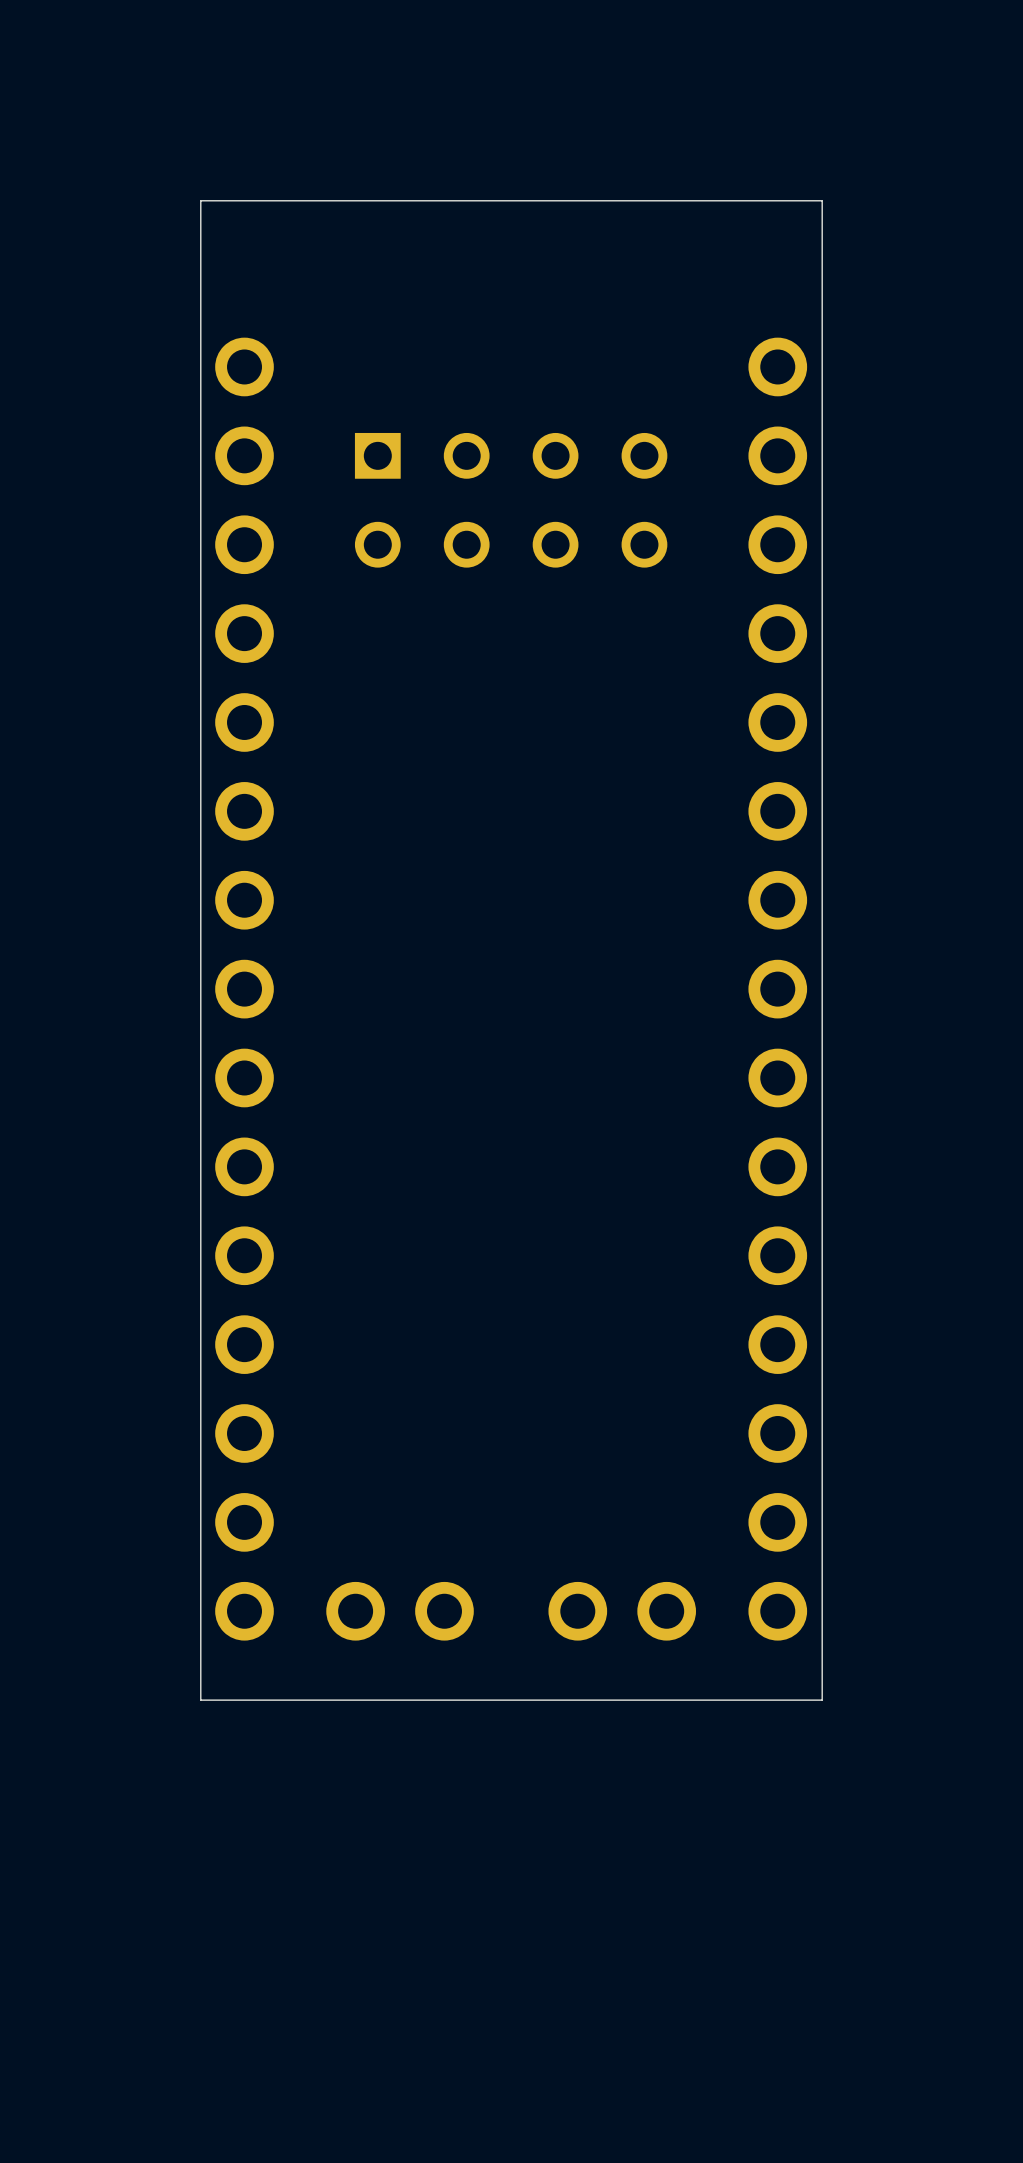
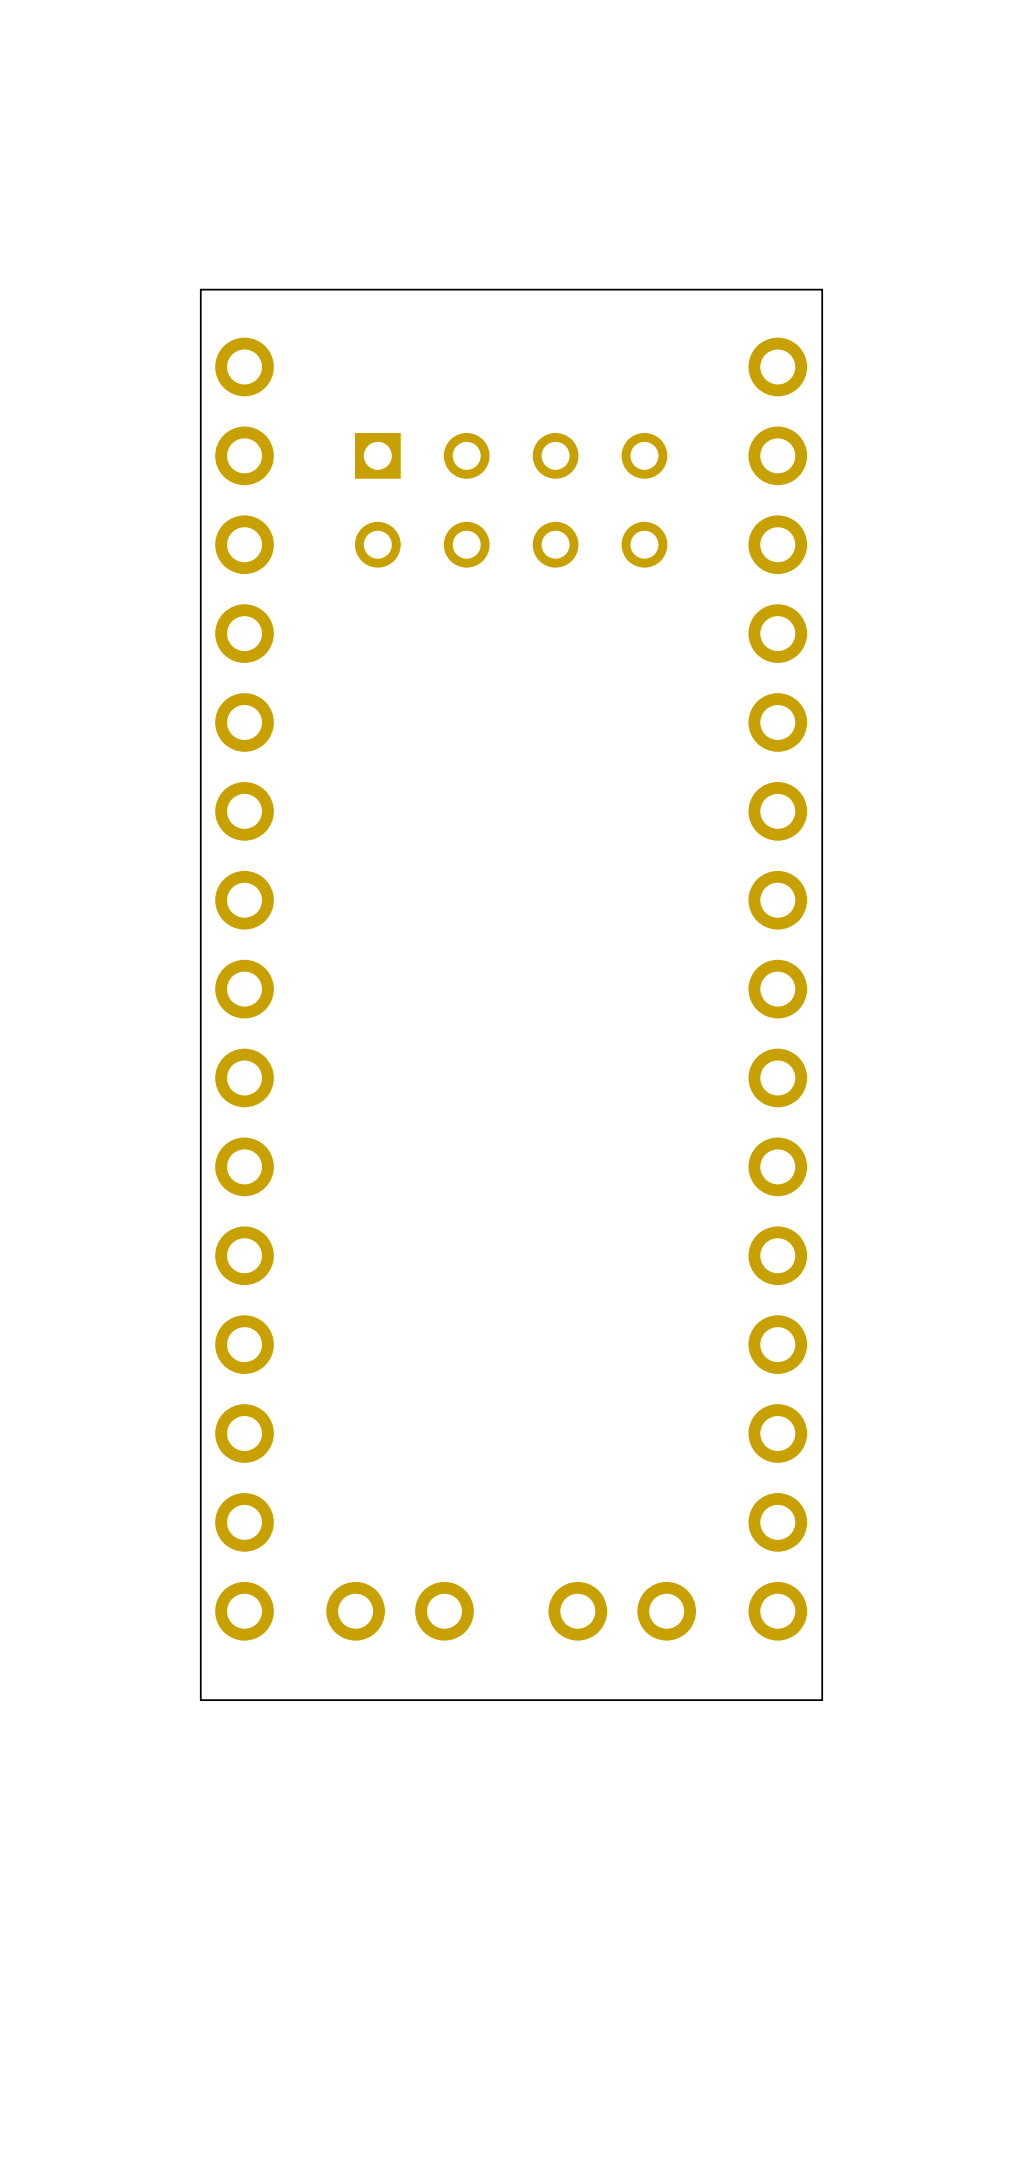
board edge: (822, 289) (822, 200) (200, 200) (200, 289) -> (822, 289) (200, 289)

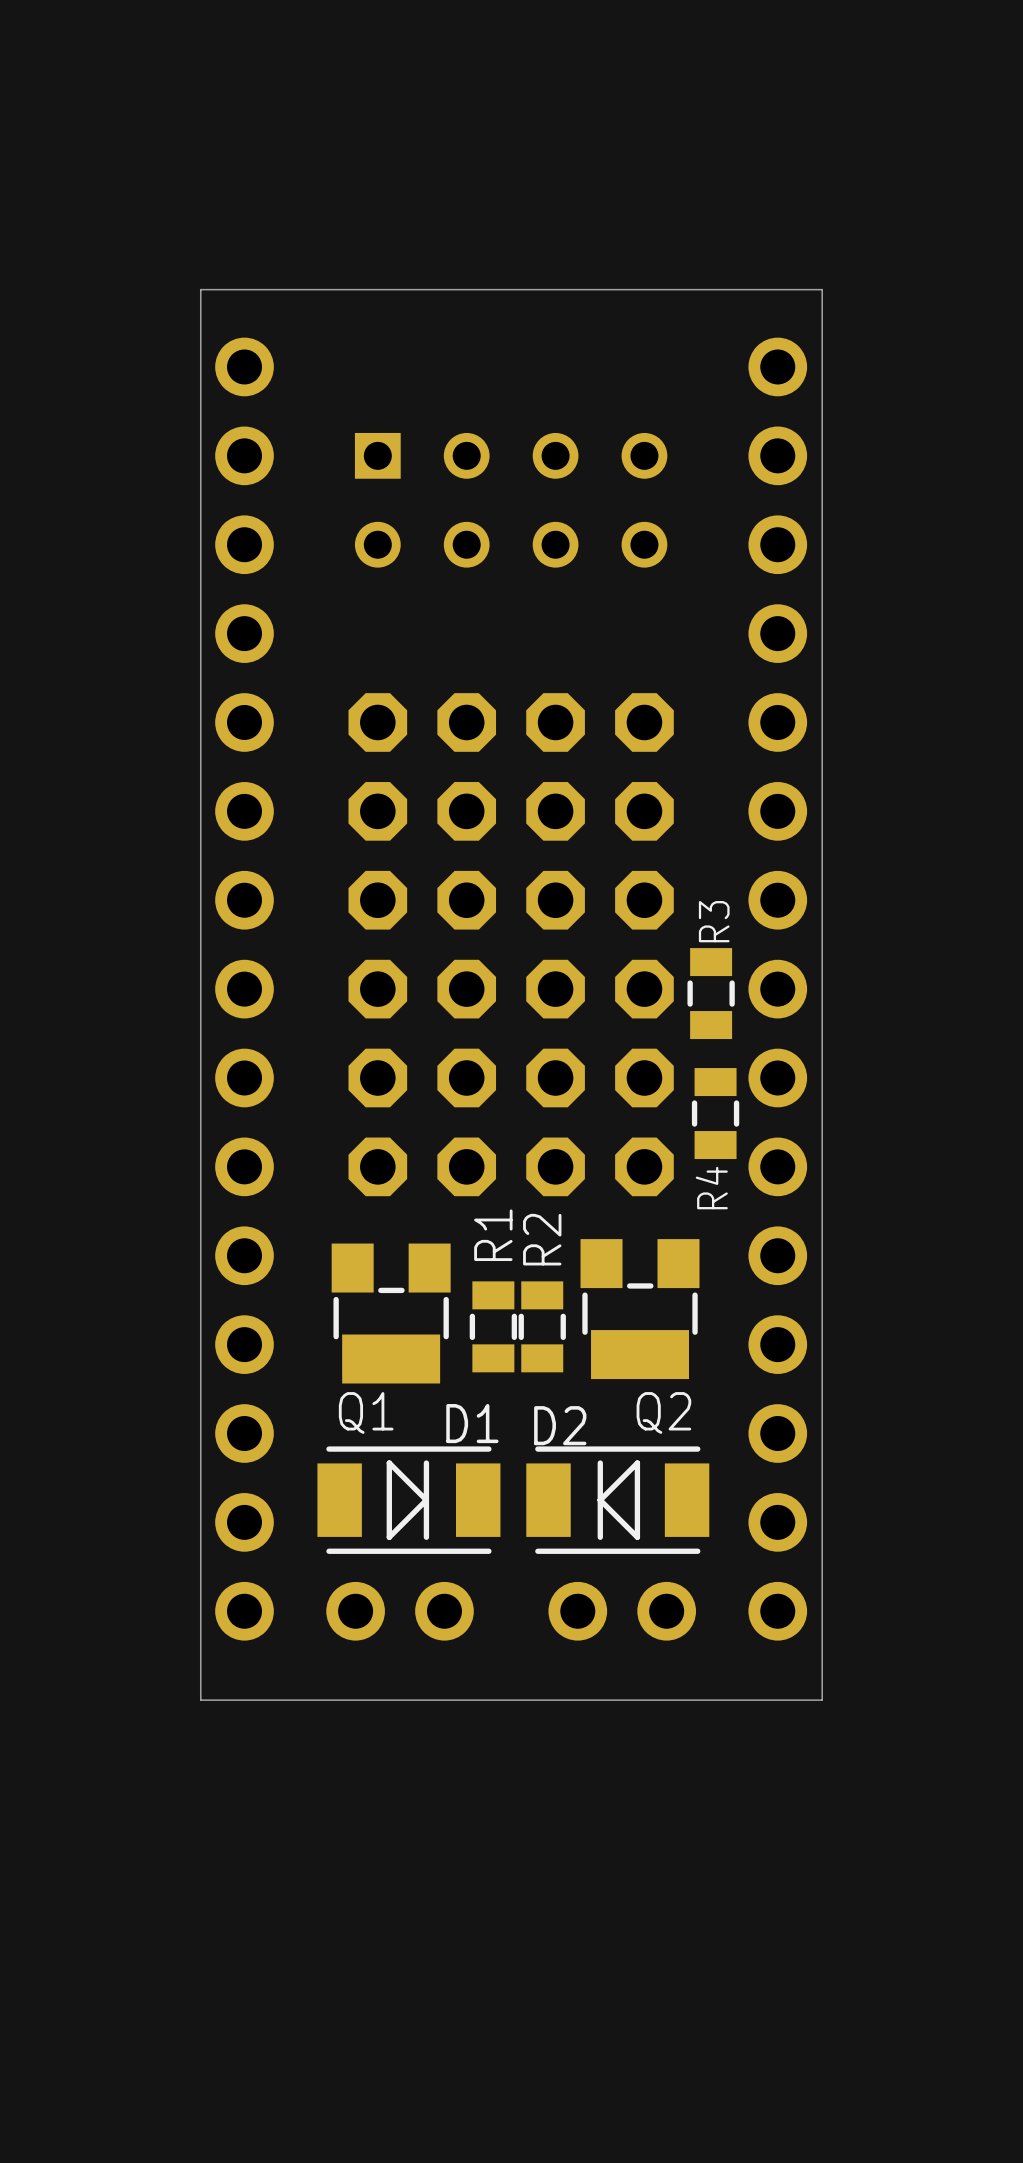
part: none -> (511, 766)
part: none -> (511, 944)
R3: none -> (711, 993)
R4: none -> (715, 1113)
part: none -> (511, 1122)
Q2: none -> (640, 1309)
Q1: none -> (391, 1313)
R1: none -> (493, 1326)
R2: none -> (542, 1326)
D1: none -> (408, 1500)
D2: none -> (617, 1500)

